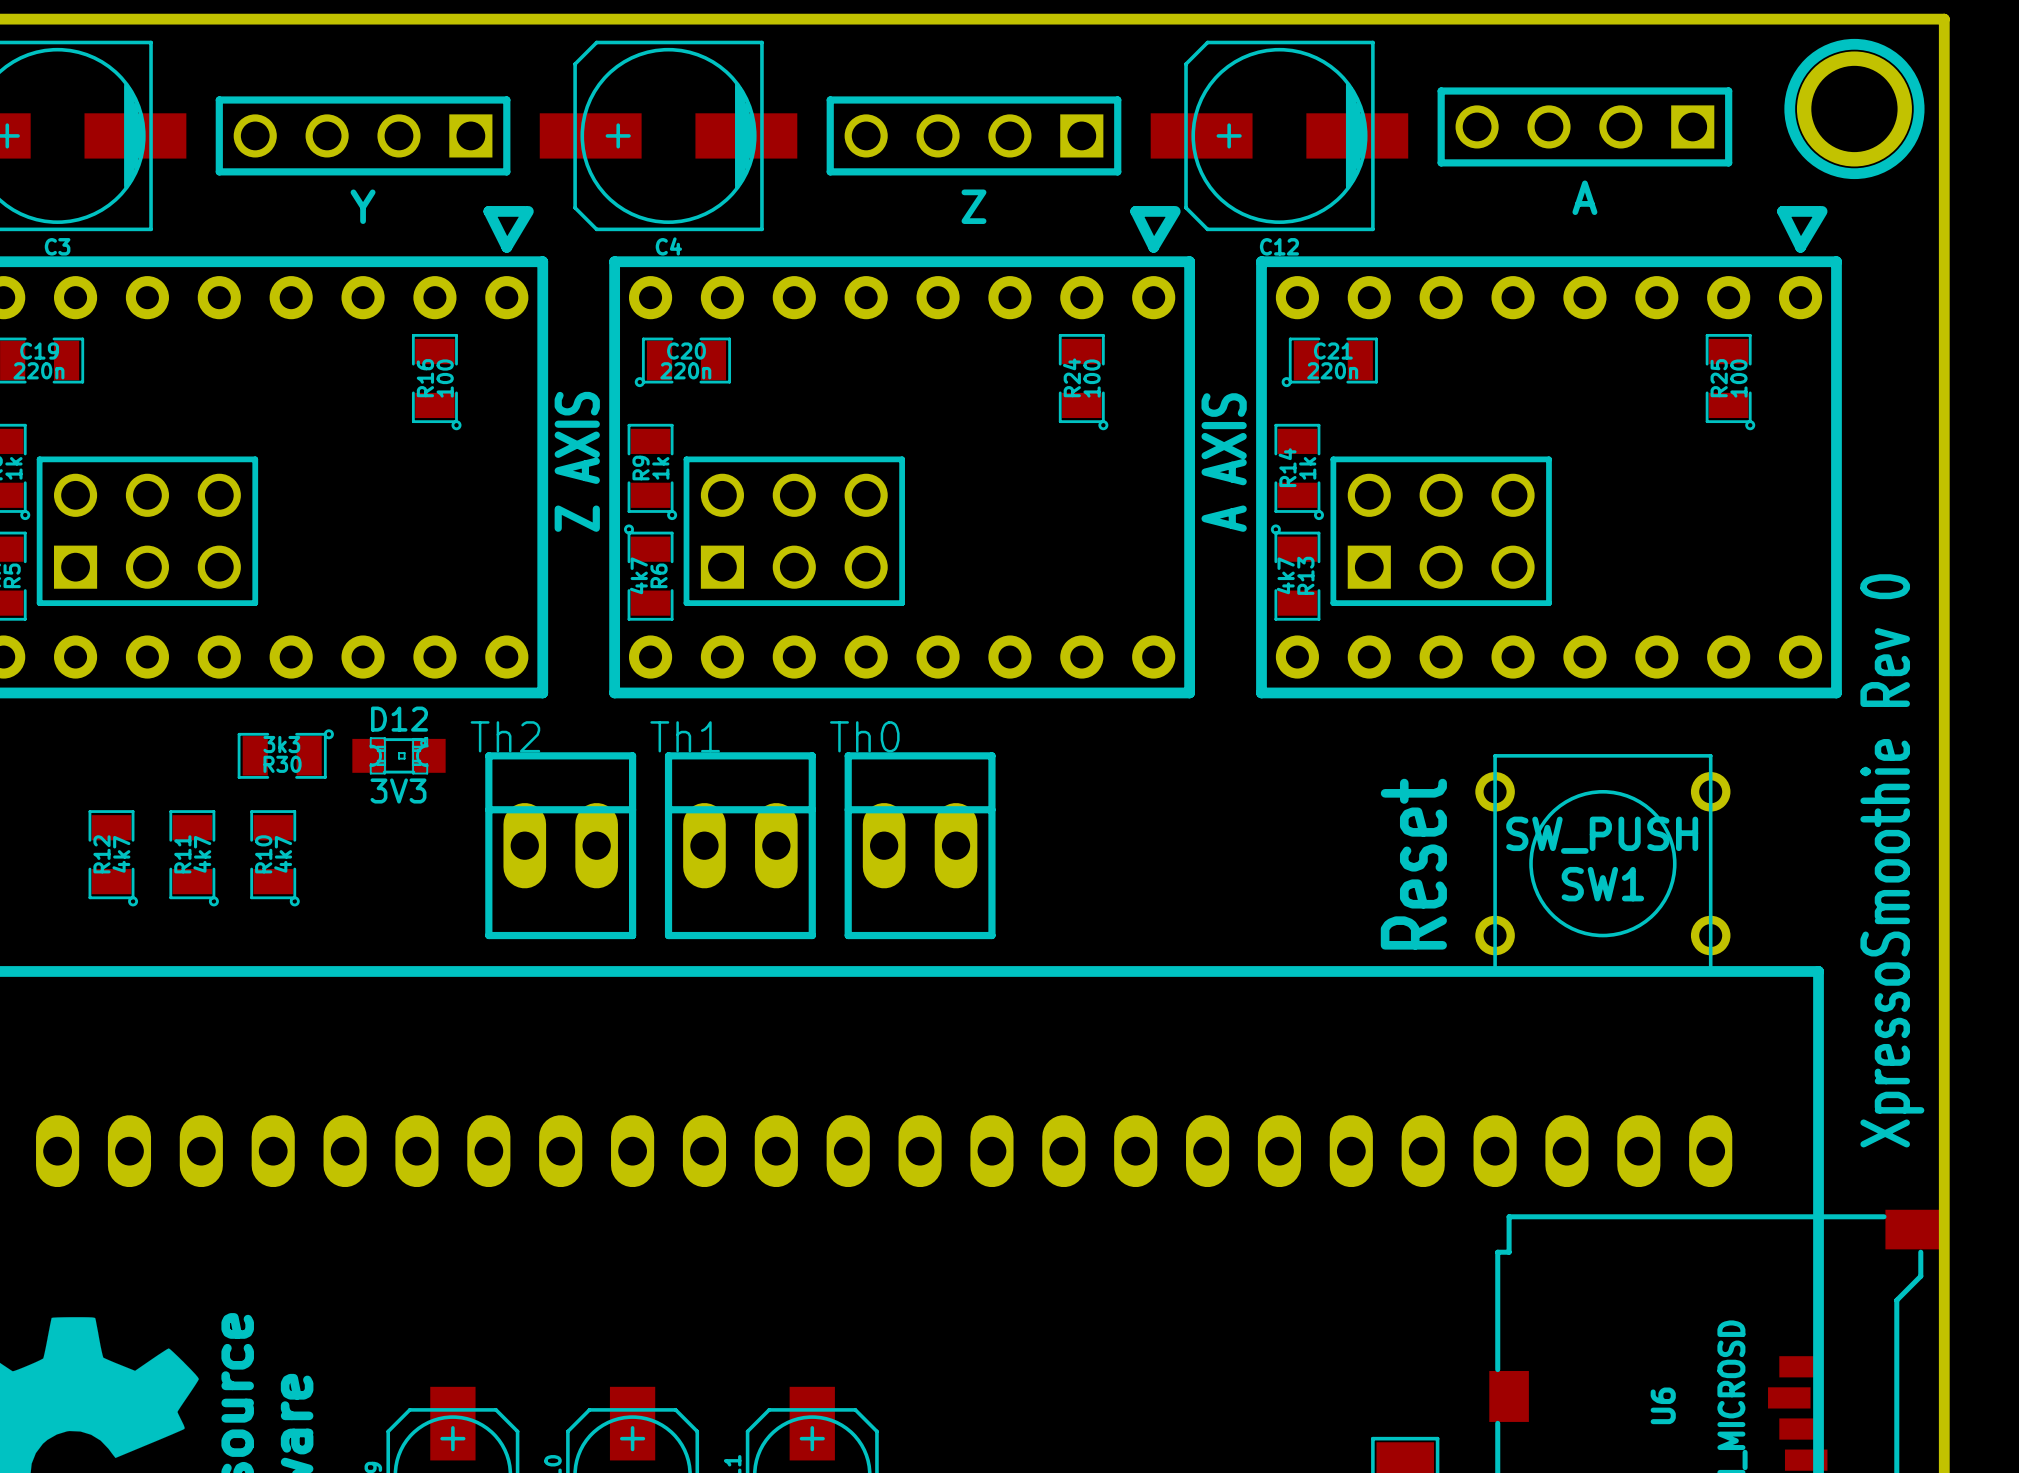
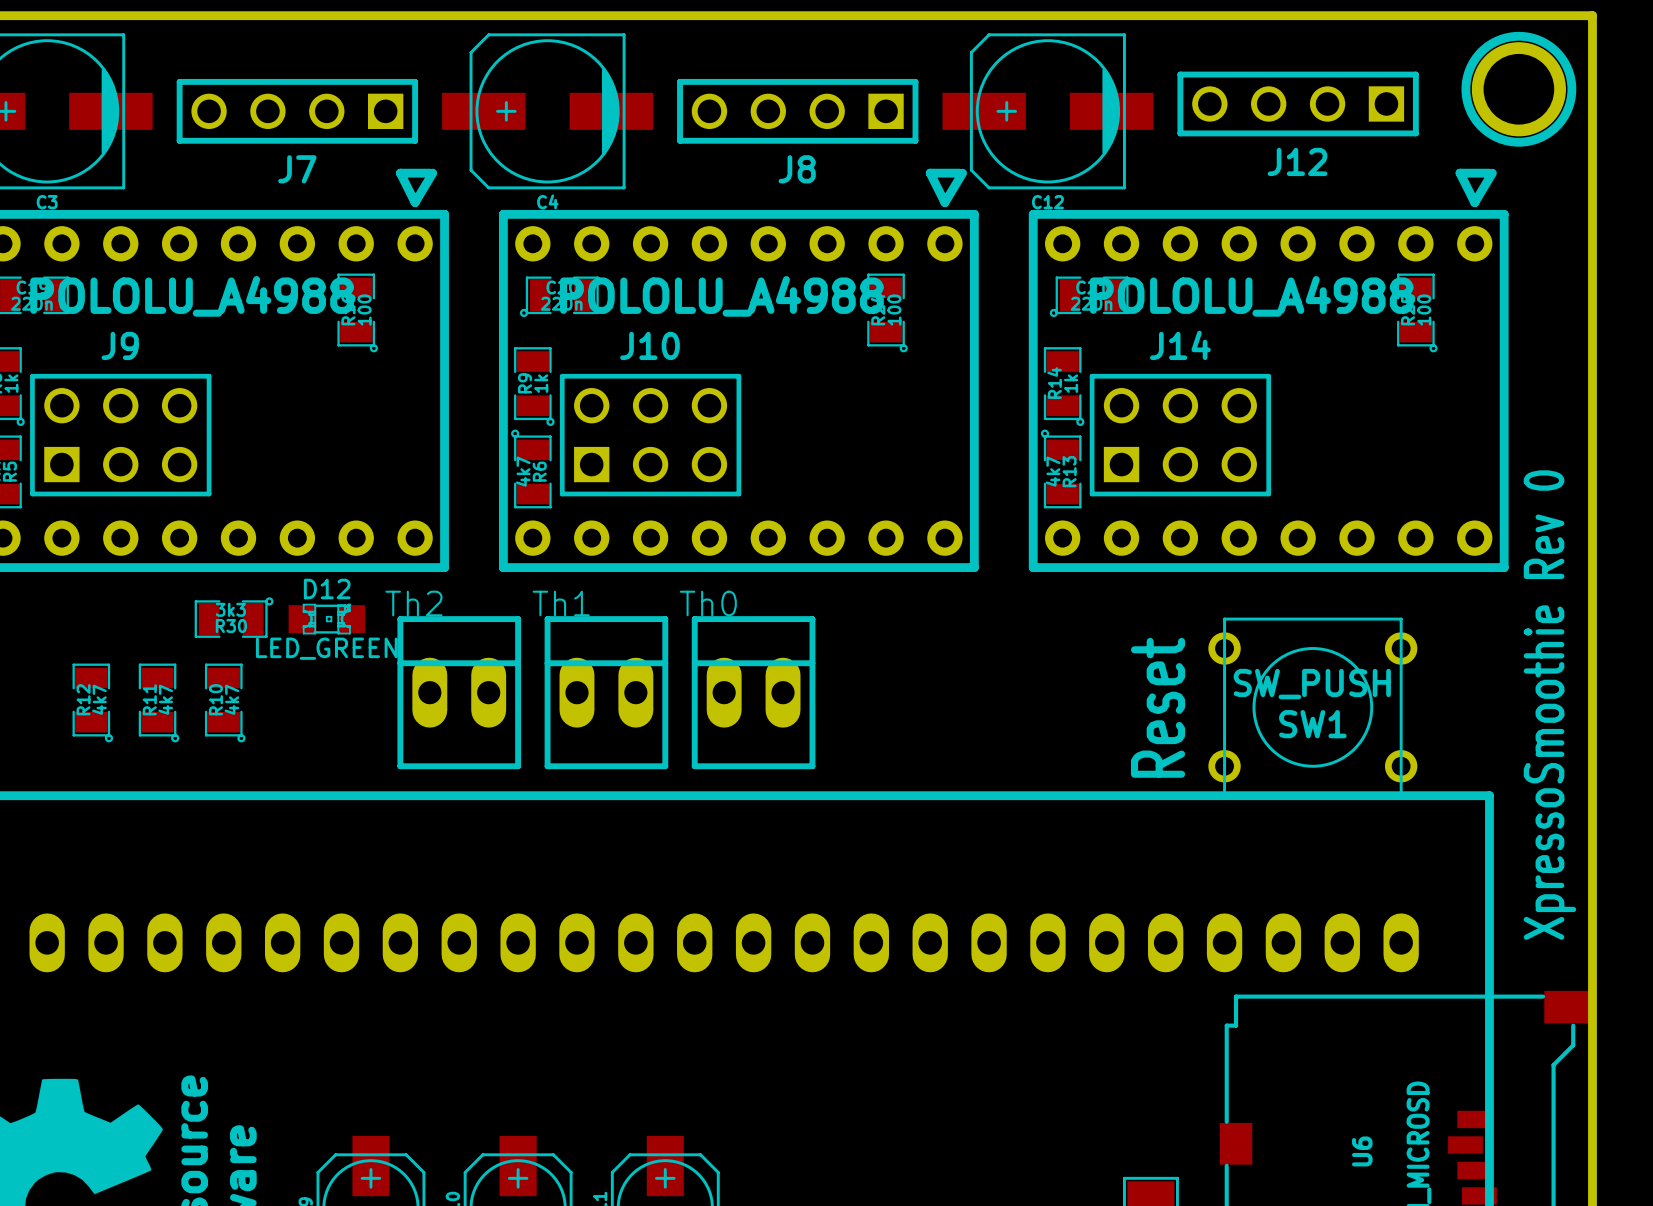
A name: A (1584, 197) -> J12 (1297, 161)
Y name: Y (363, 206) -> J7 (297, 169)
Z name: Z (973, 206) -> J8 (797, 169)
part value: none -> POLOLU_A4988 (192, 296)
part value: none -> POLOLU_A4988 (721, 296)
part value: none -> POLOLU_A4988 (1251, 296)
J14 name: none -> J14 (1180, 345)
J9 name: none -> J9 (120, 345)
J10 name: none -> J10 (650, 345)
text: Z AXIS (577, 461) -> none
text: A AXIS (1224, 462) -> none
D12 value: 3V3 (398, 790) -> LED_GREEN (326, 648)

